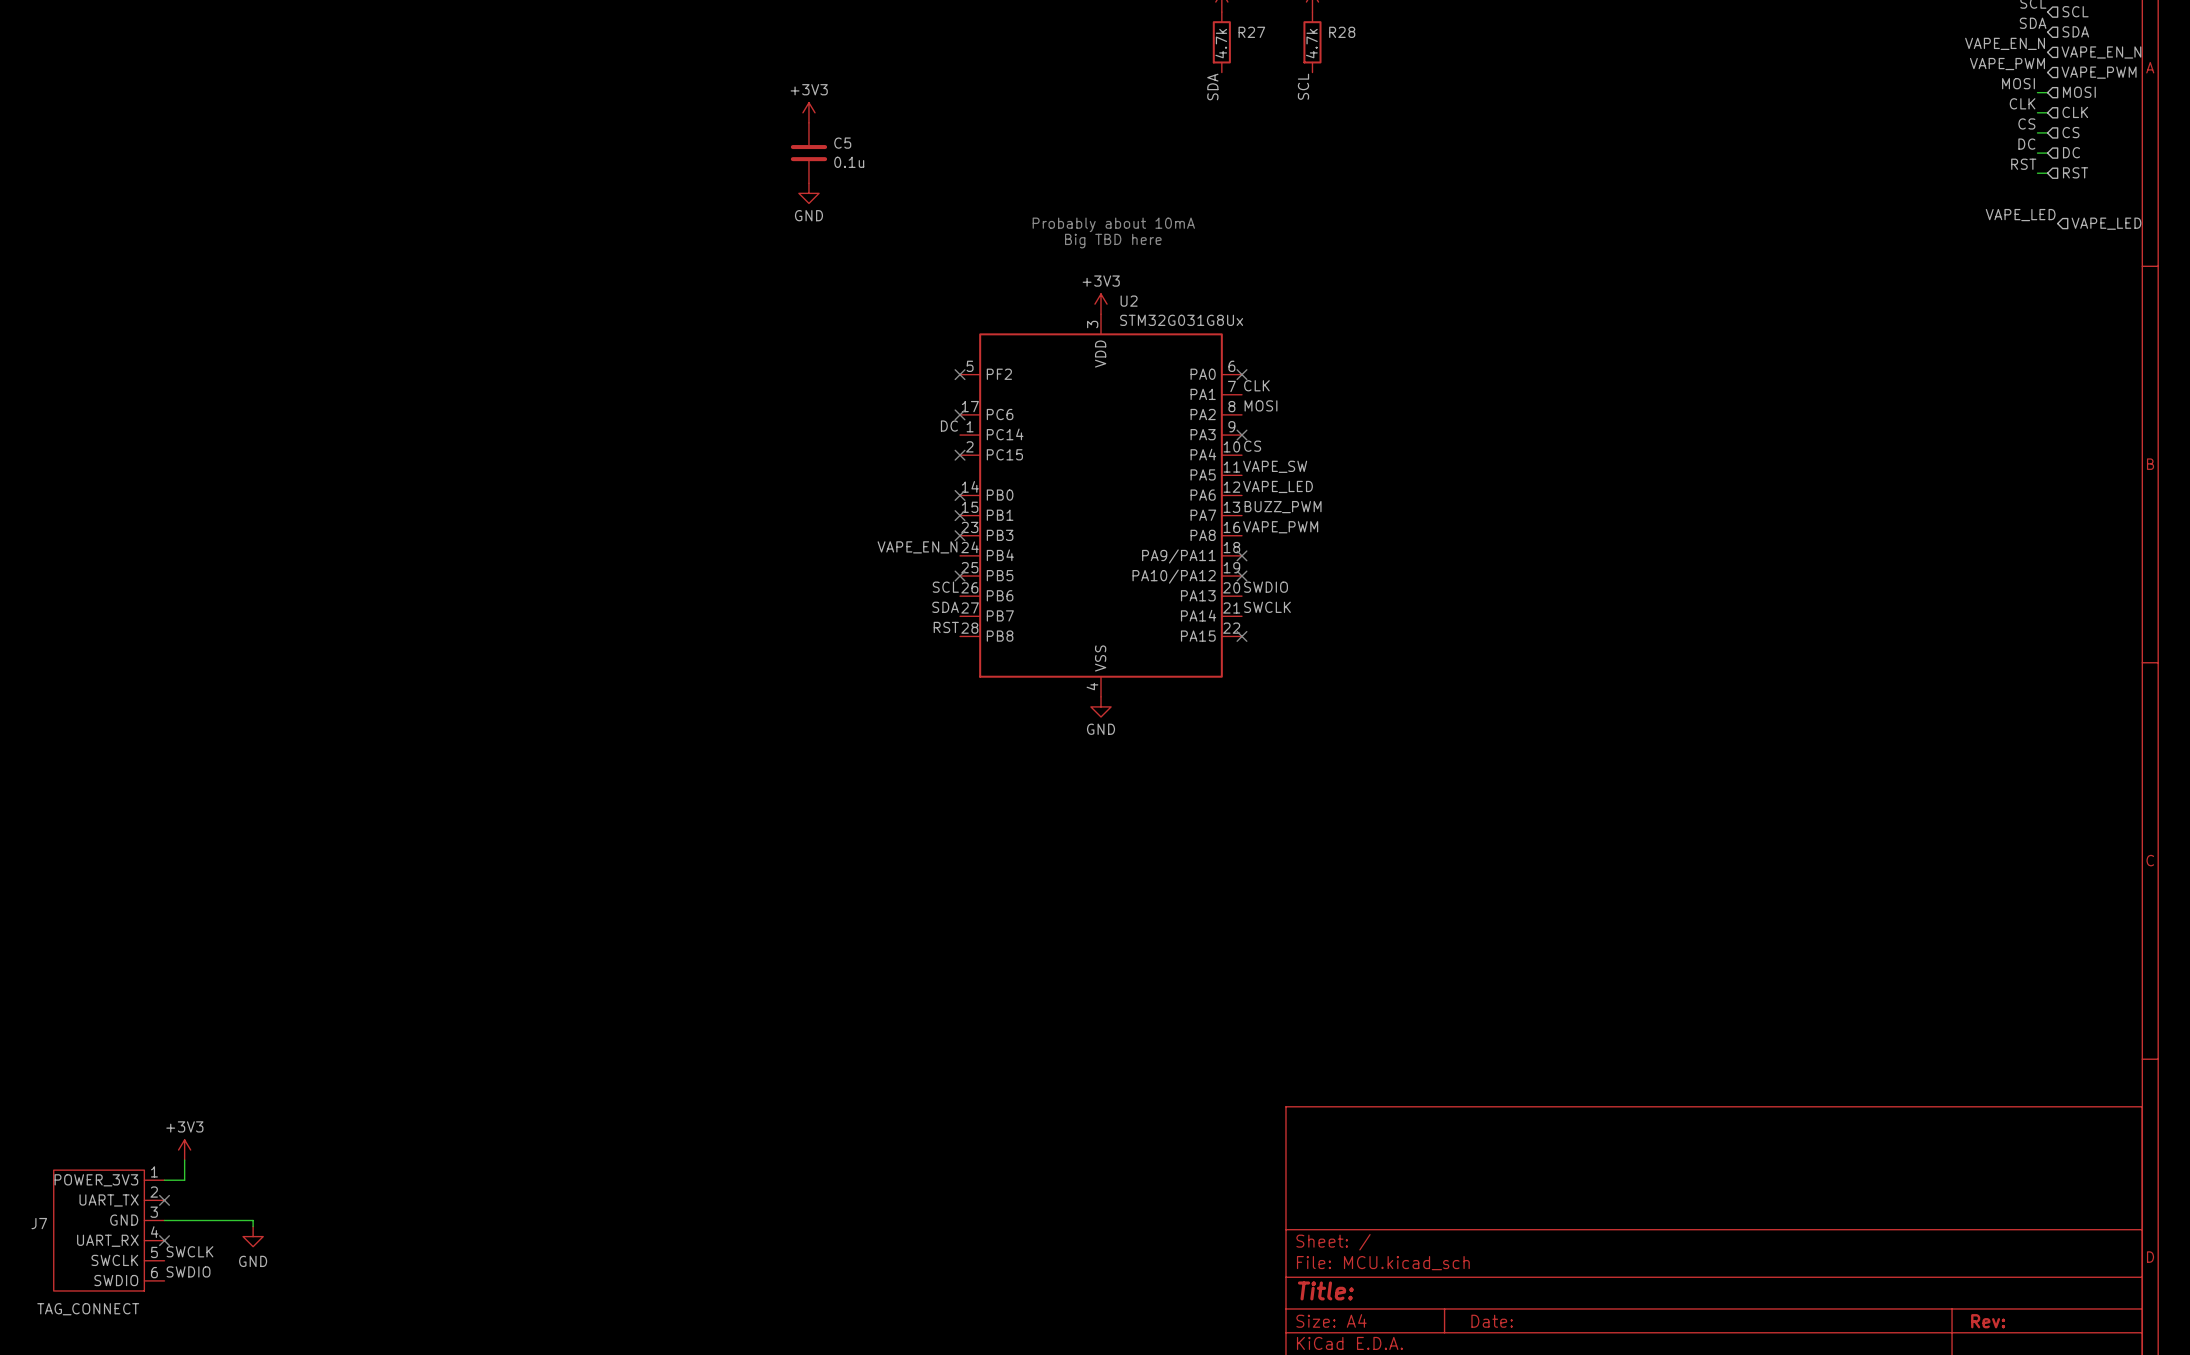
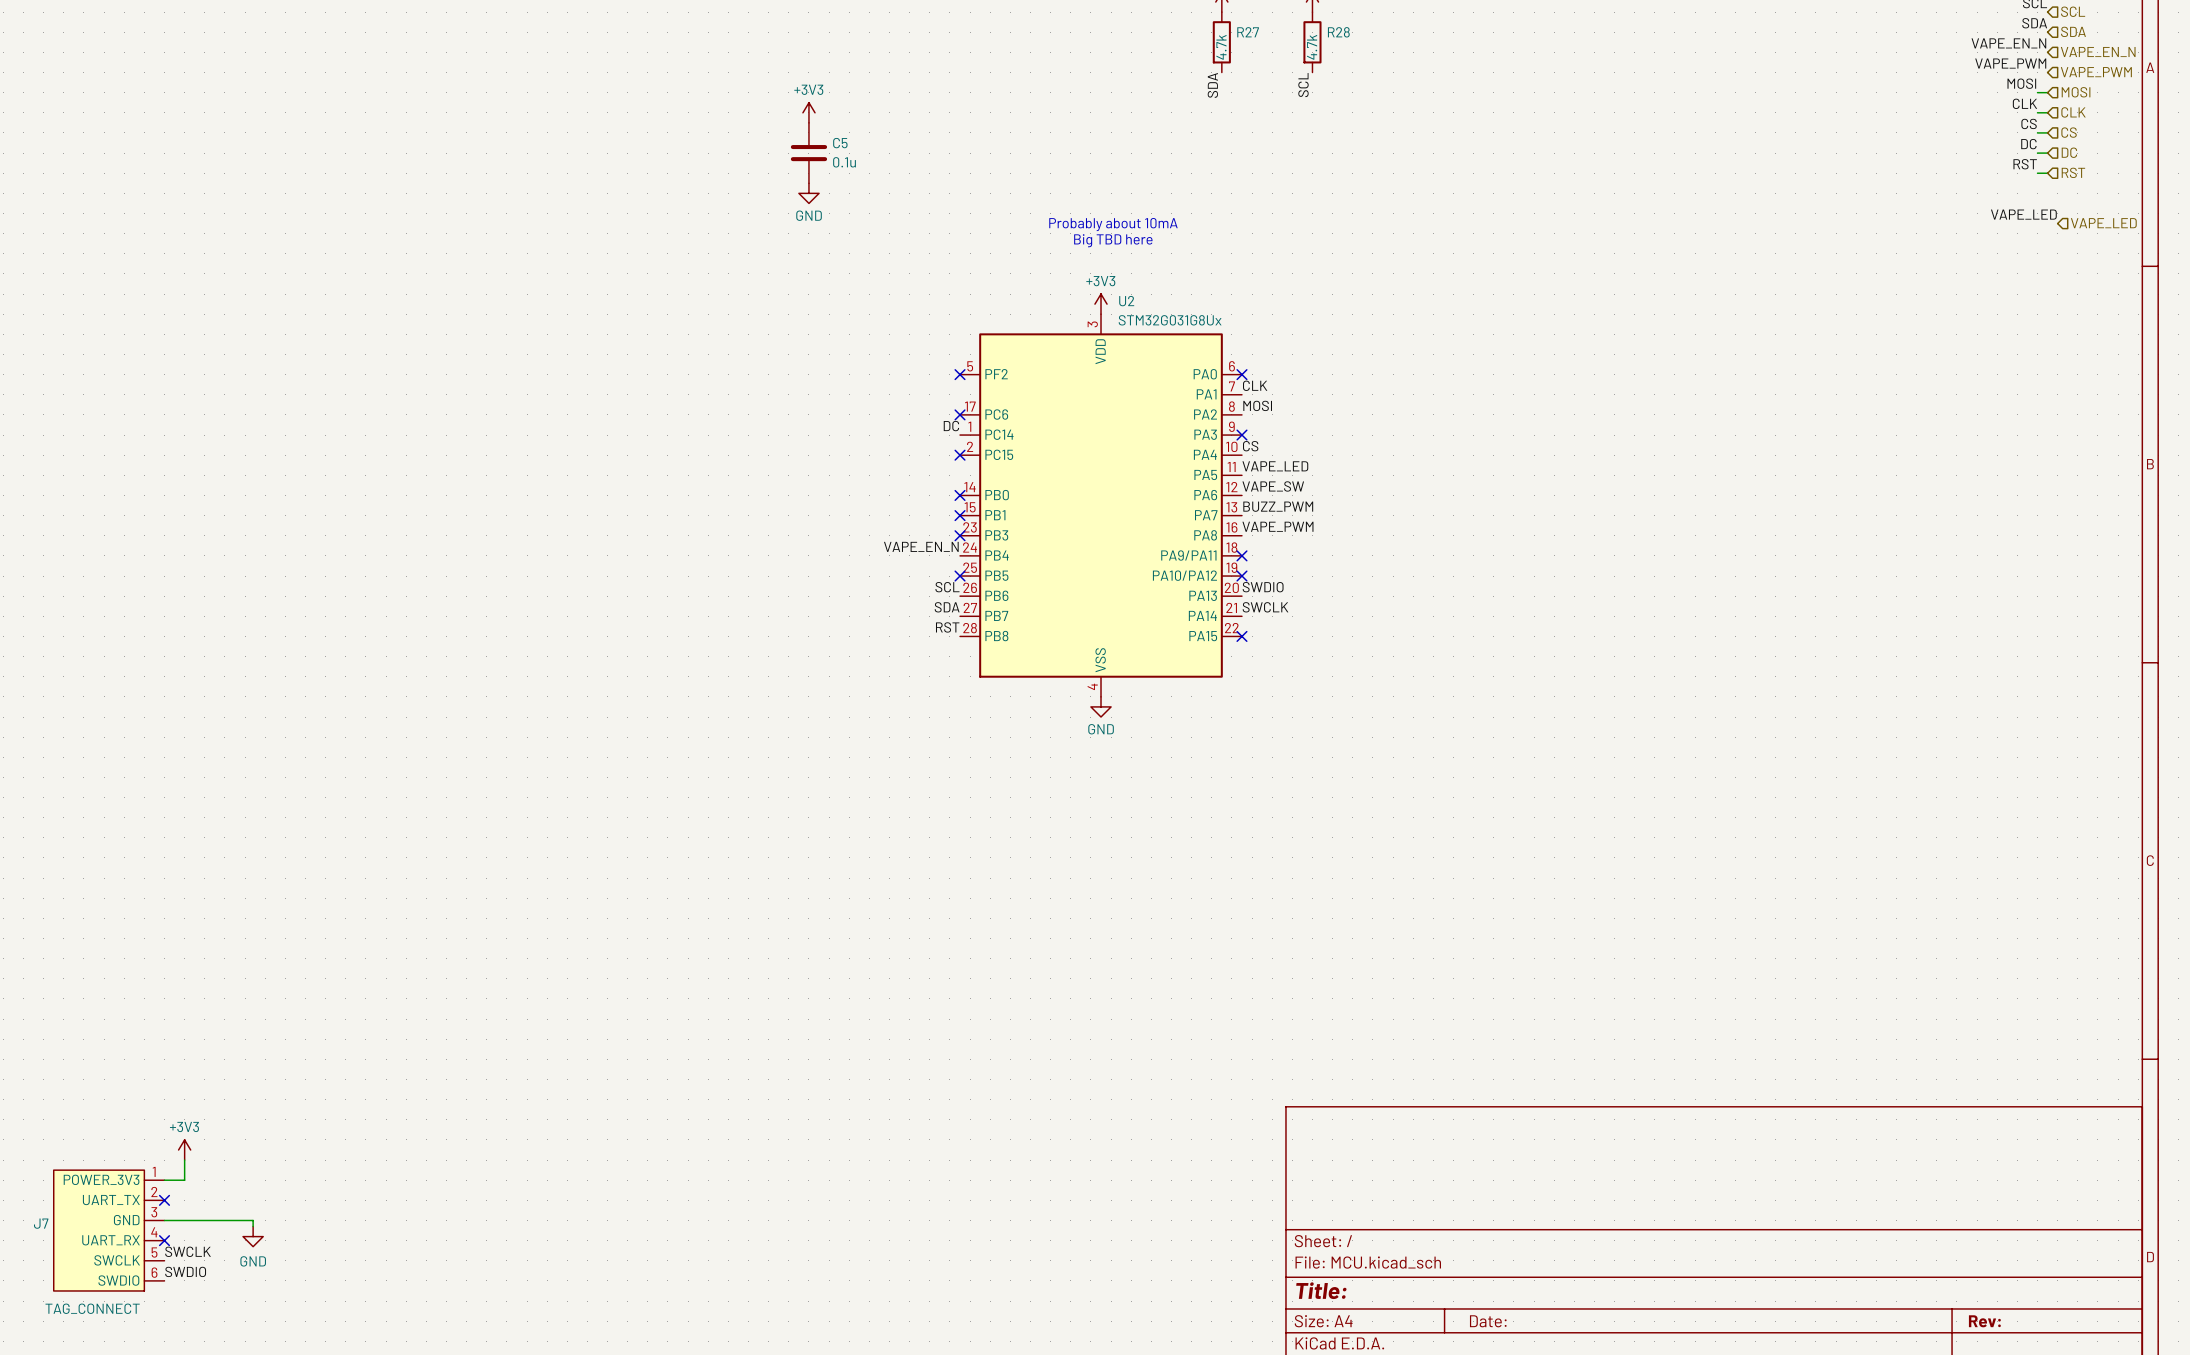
label: VAPE_SW (1275, 466) -> VAPE_LED (1275, 466)
label: VAPE_LED (1278, 486) -> VAPE_SW (1273, 486)

